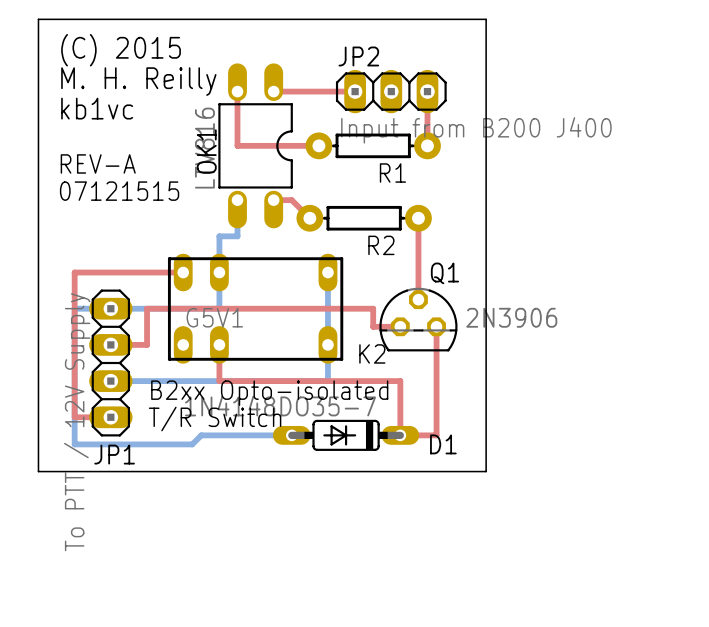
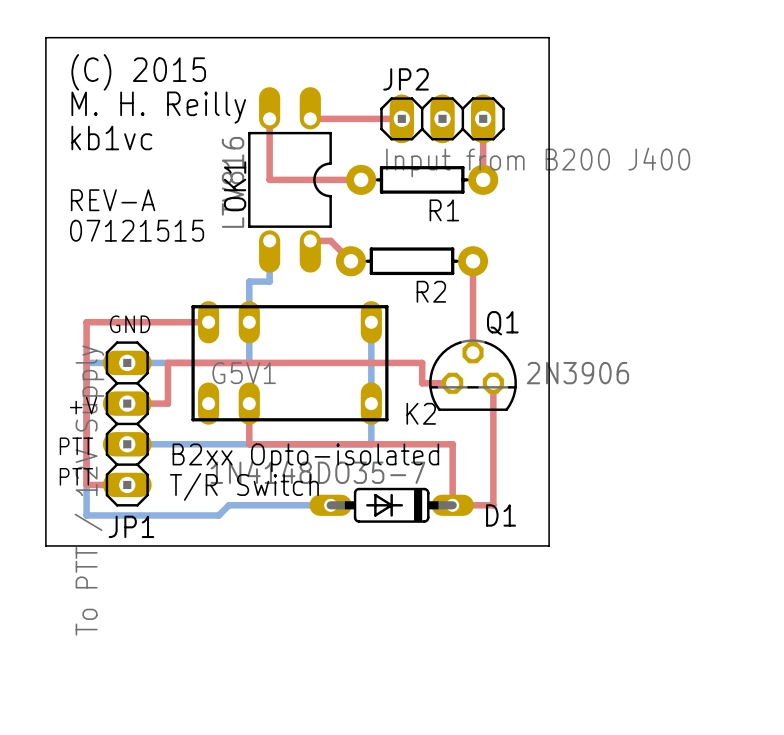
text: none -> GND (130, 324)
text: none -> +V (83, 405)
text: none -> PTT (76, 446)
text: none -> PTT (76, 476)

